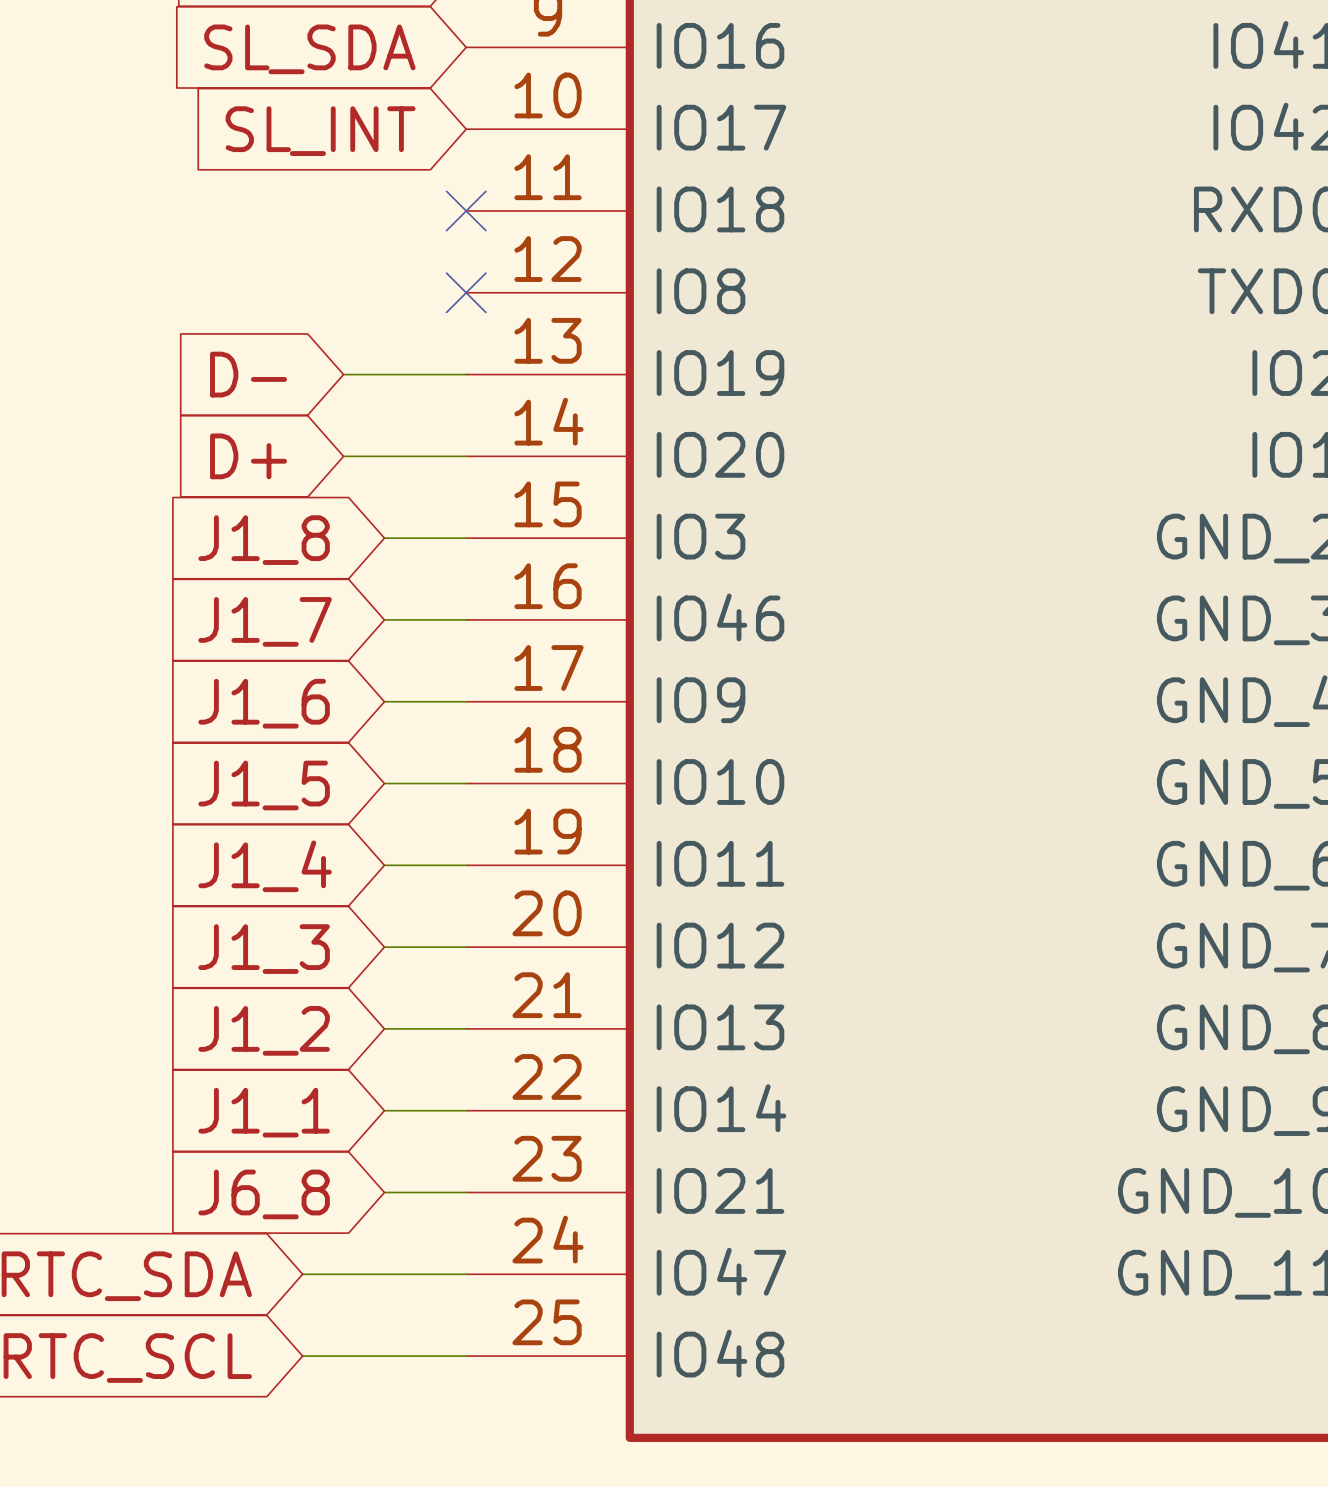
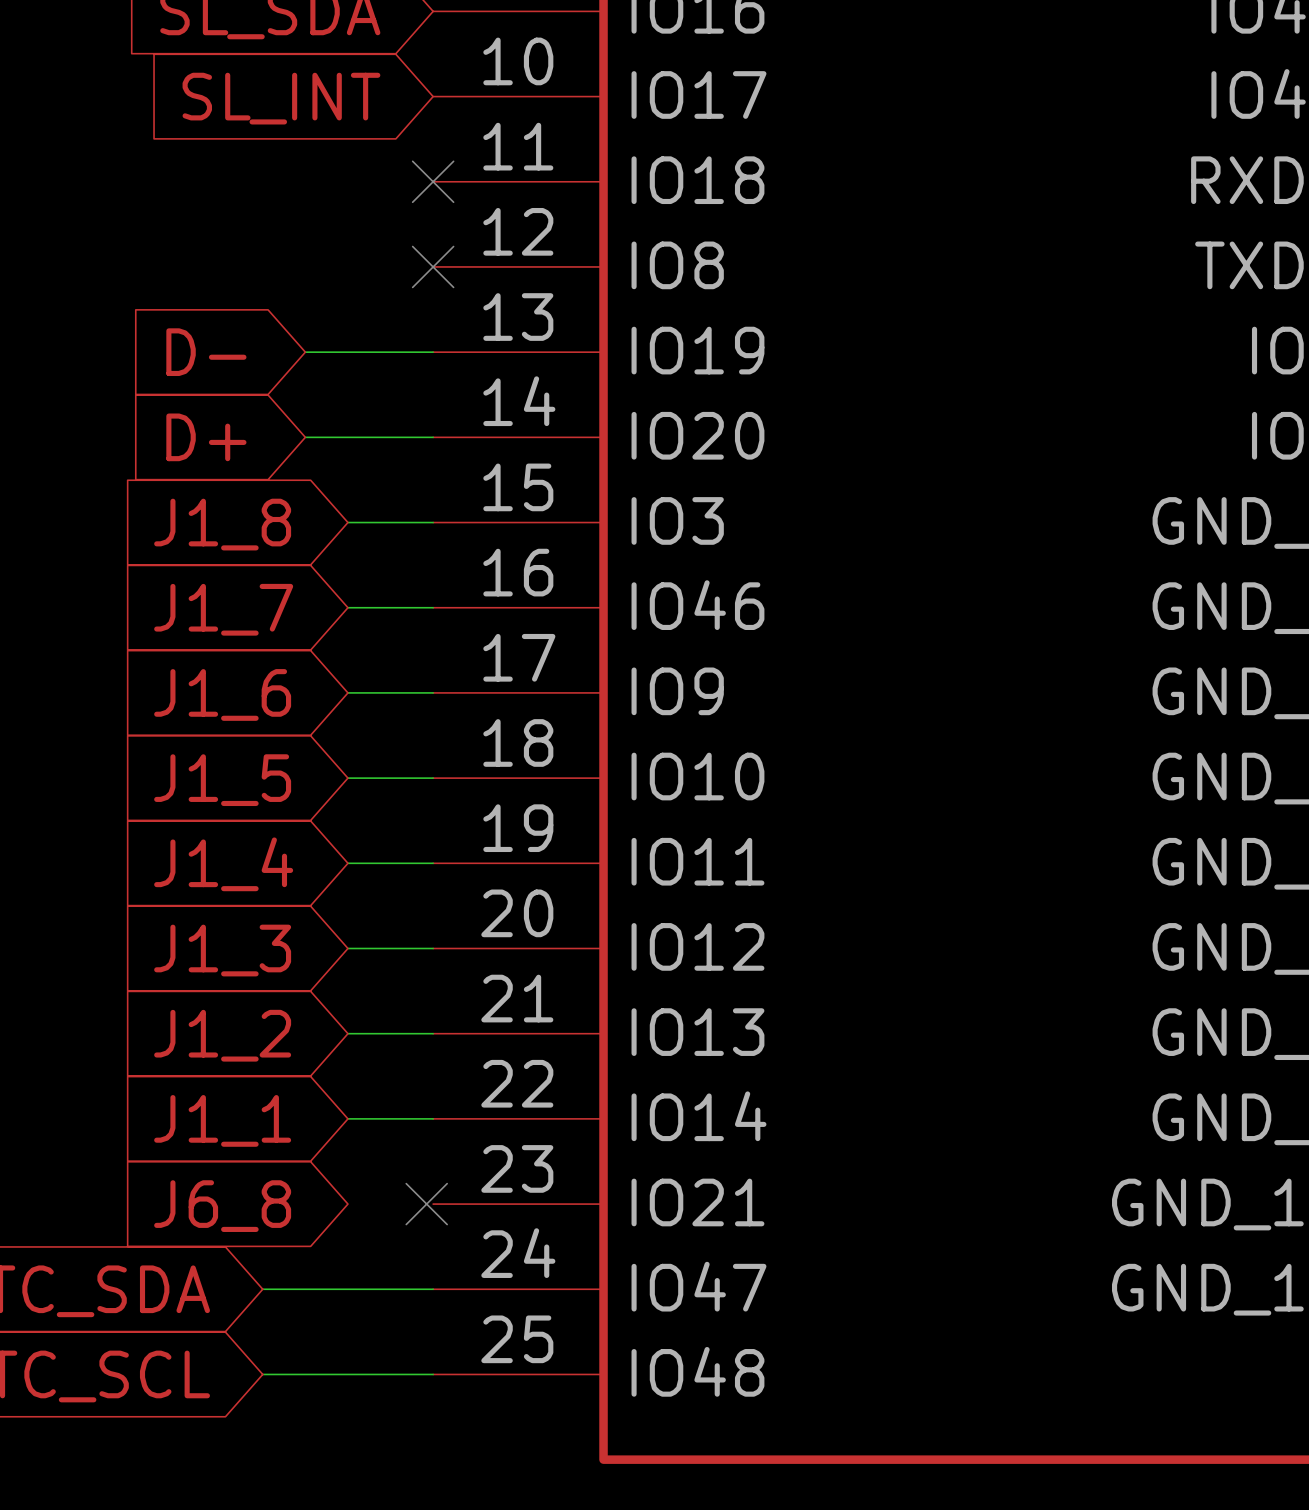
wire: (384, 1192) (466, 1192) -> none
no-connect mark: none -> (426, 1204)

